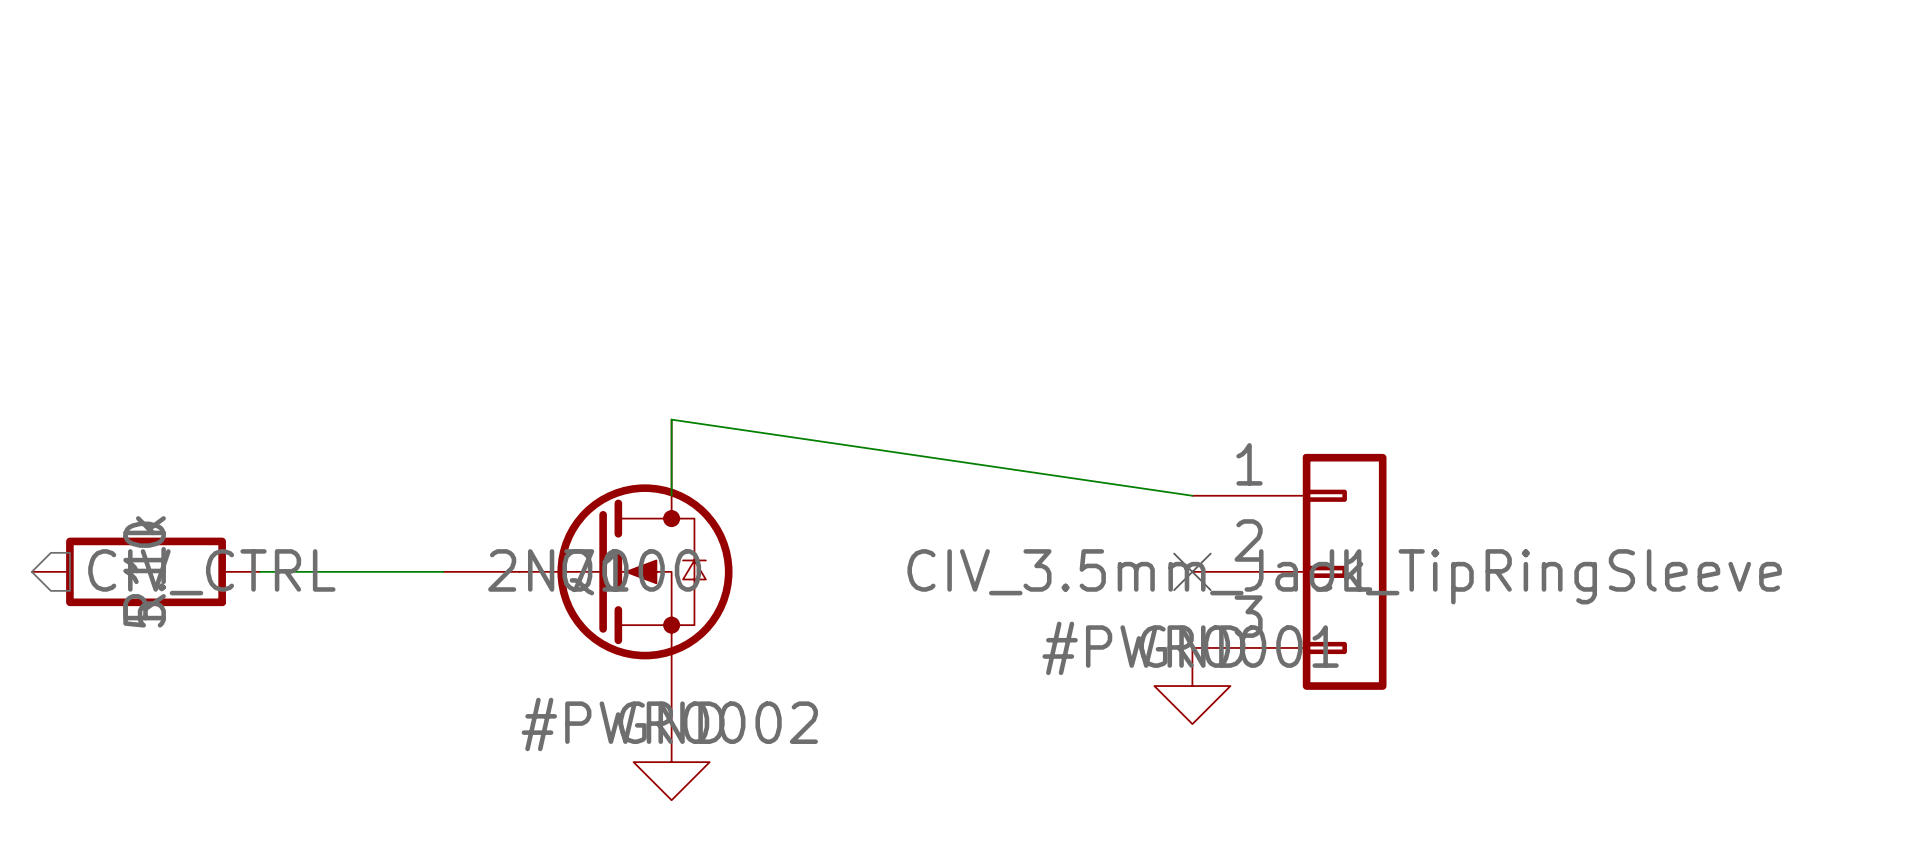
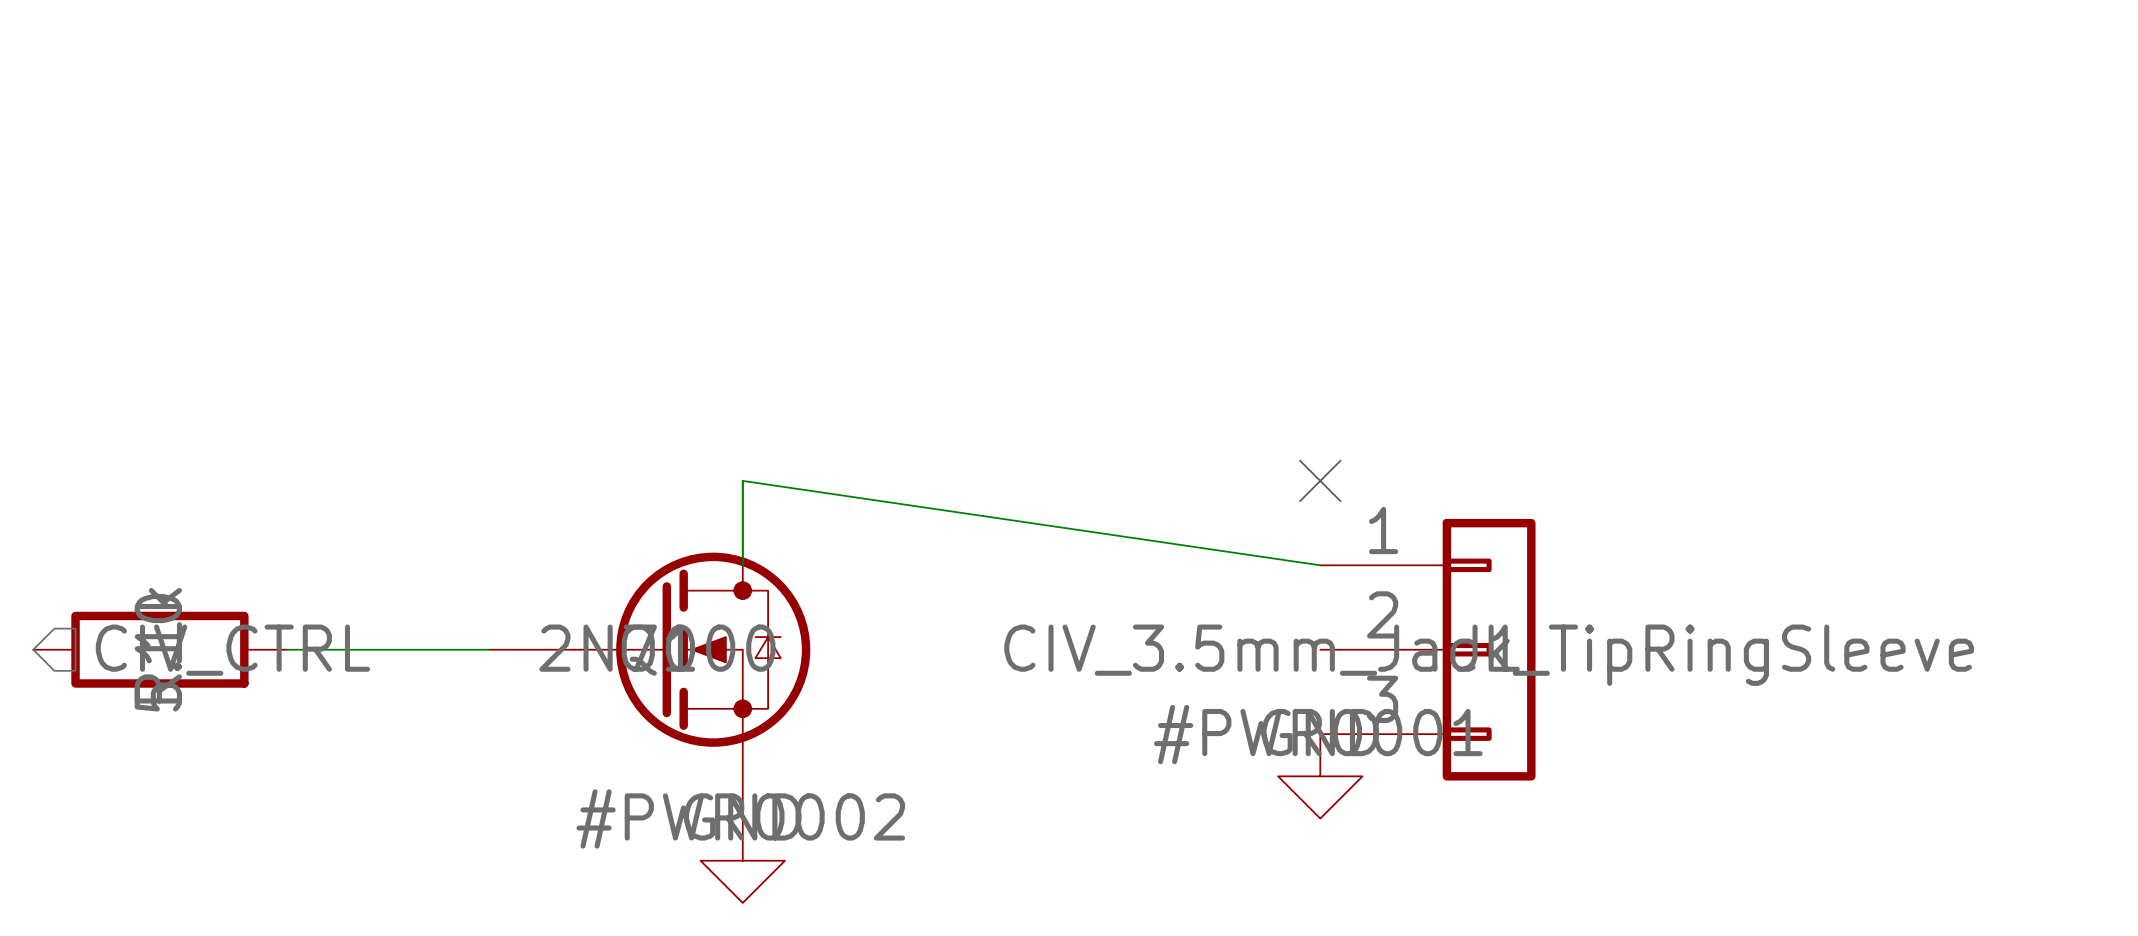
no-connect mark position: (1192, 571) -> (1320, 480)

